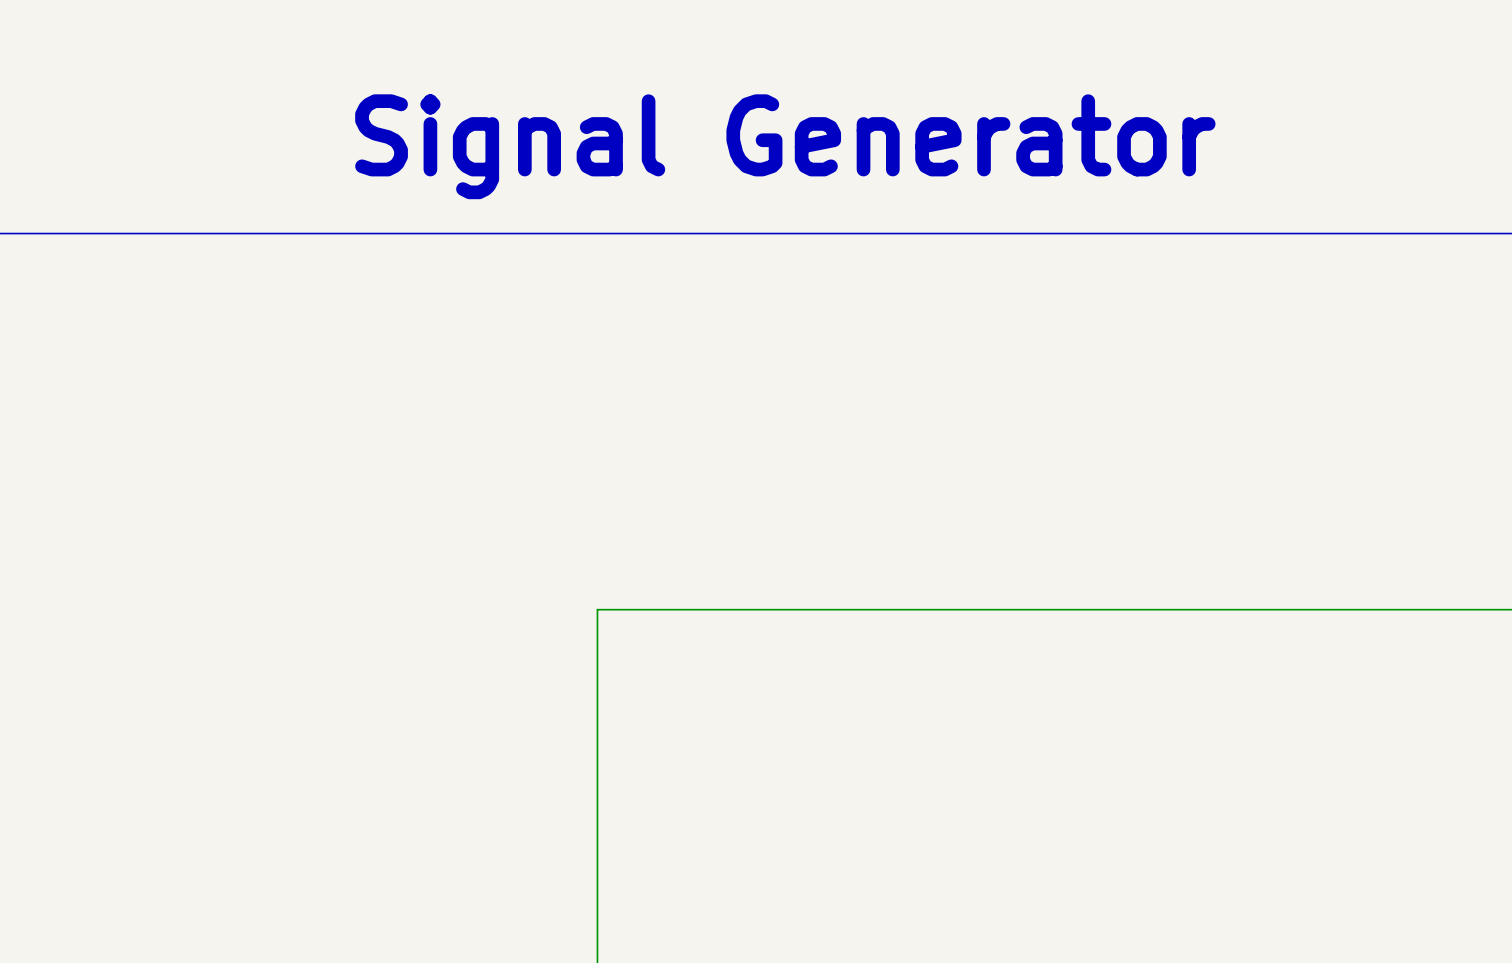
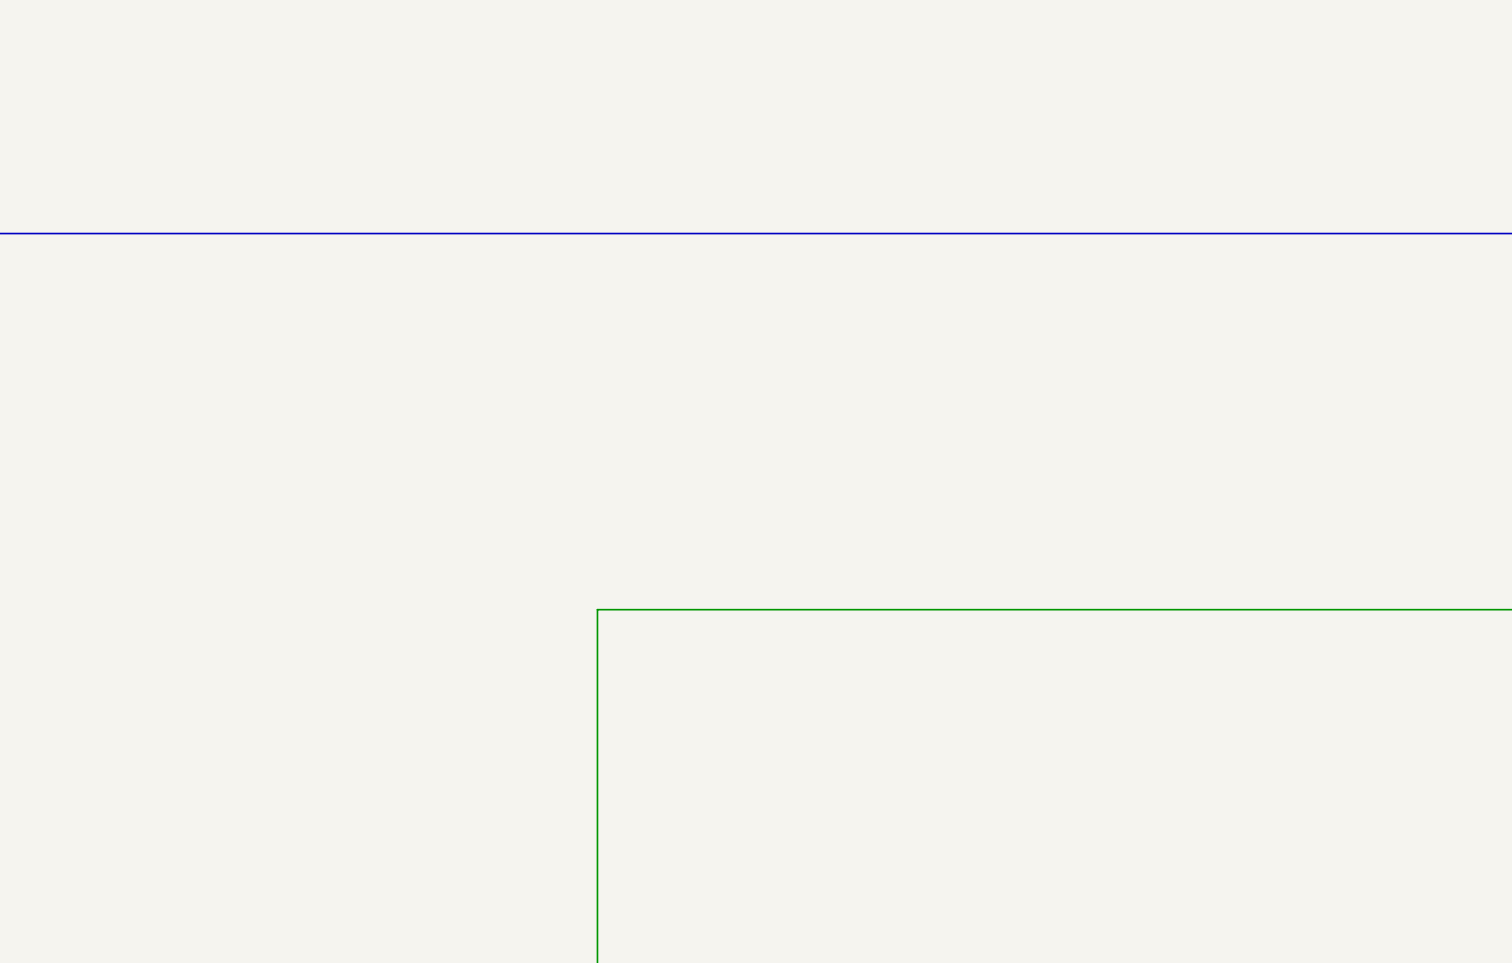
text: Signal Generator (785, 146) -> none

